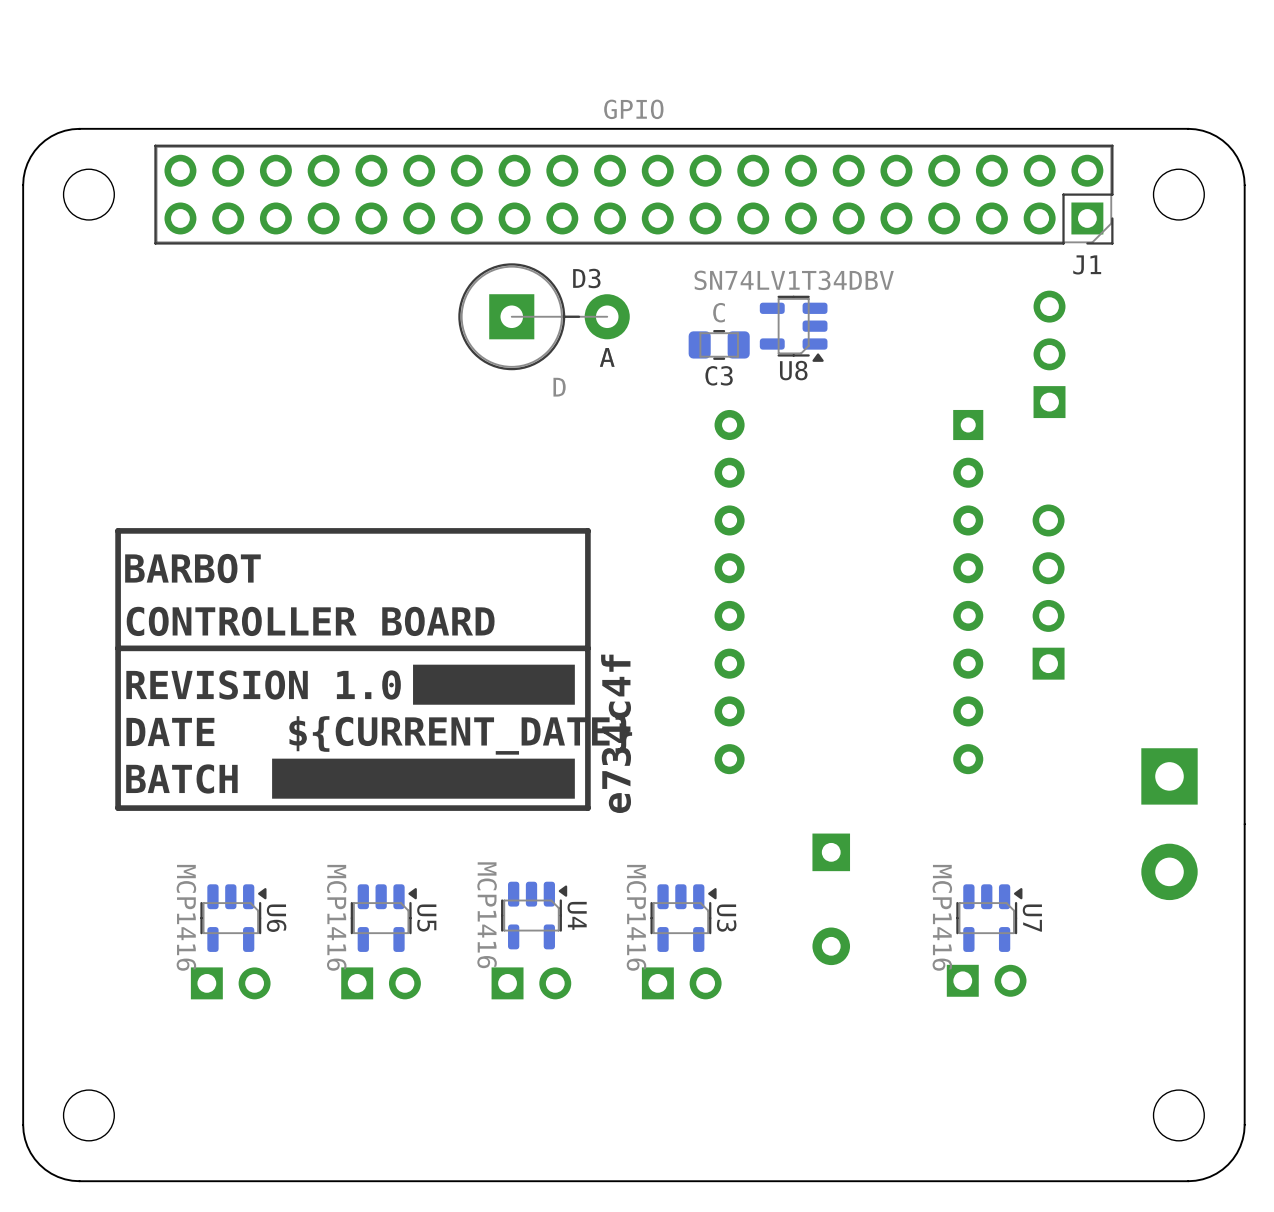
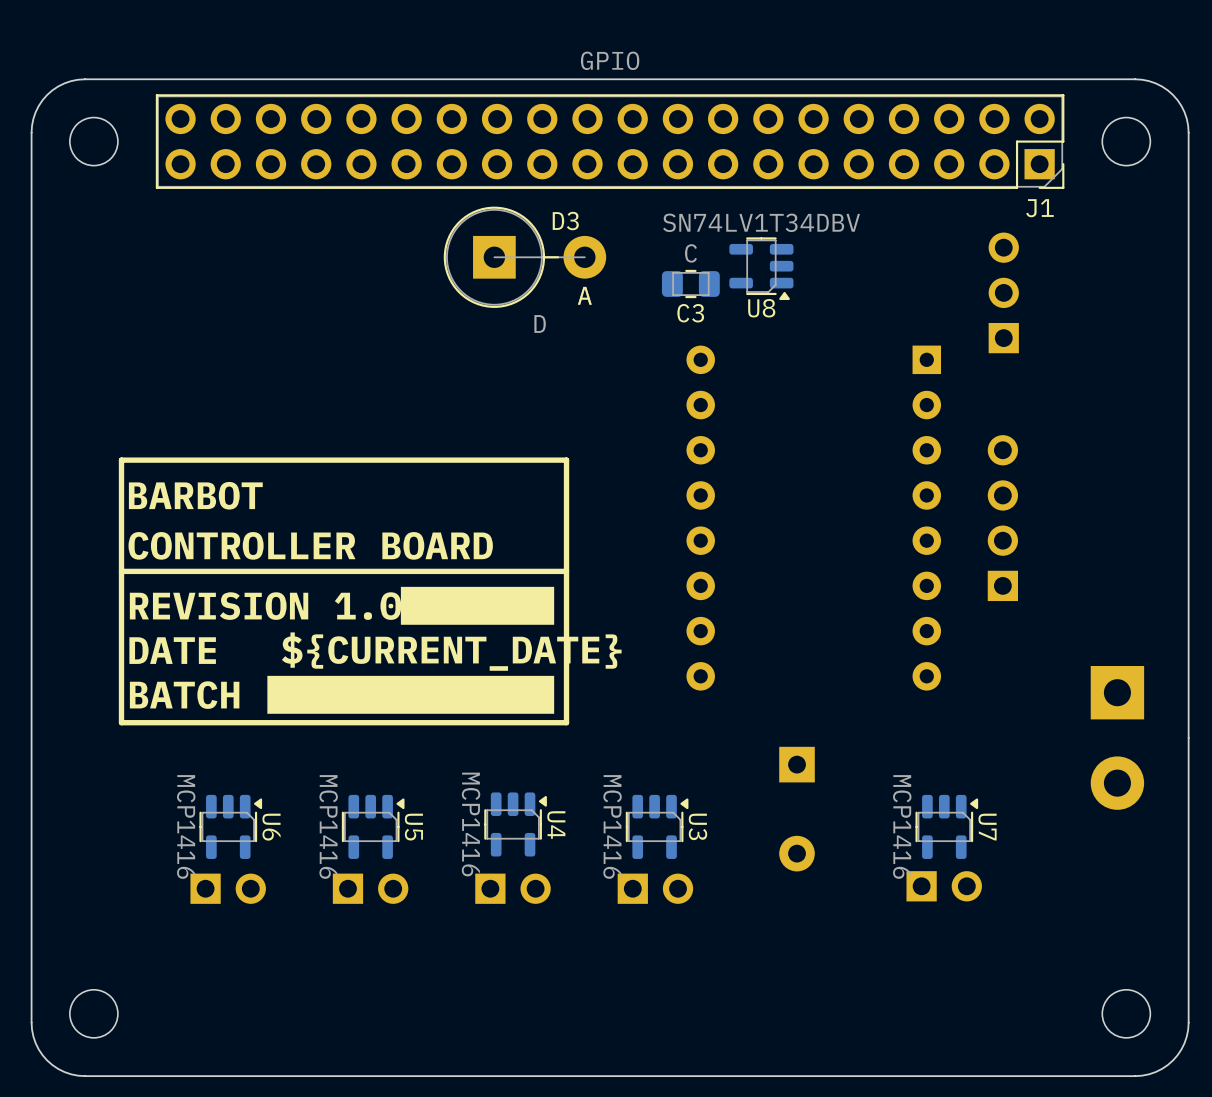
text: e734c4f (616, 733) -> none

